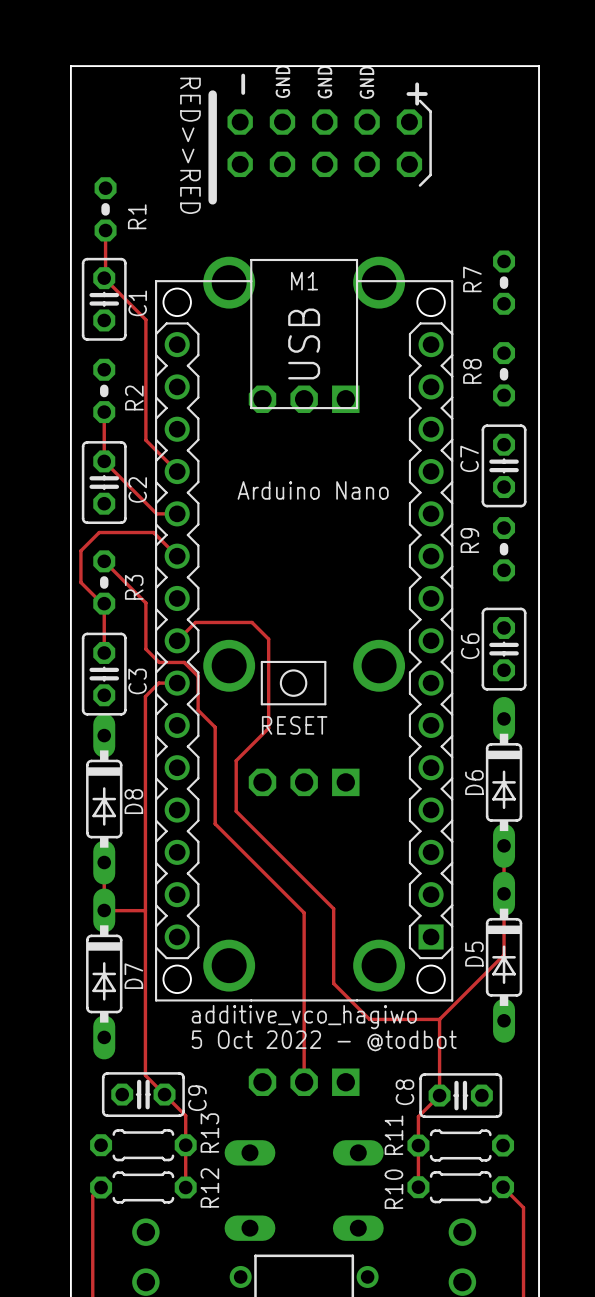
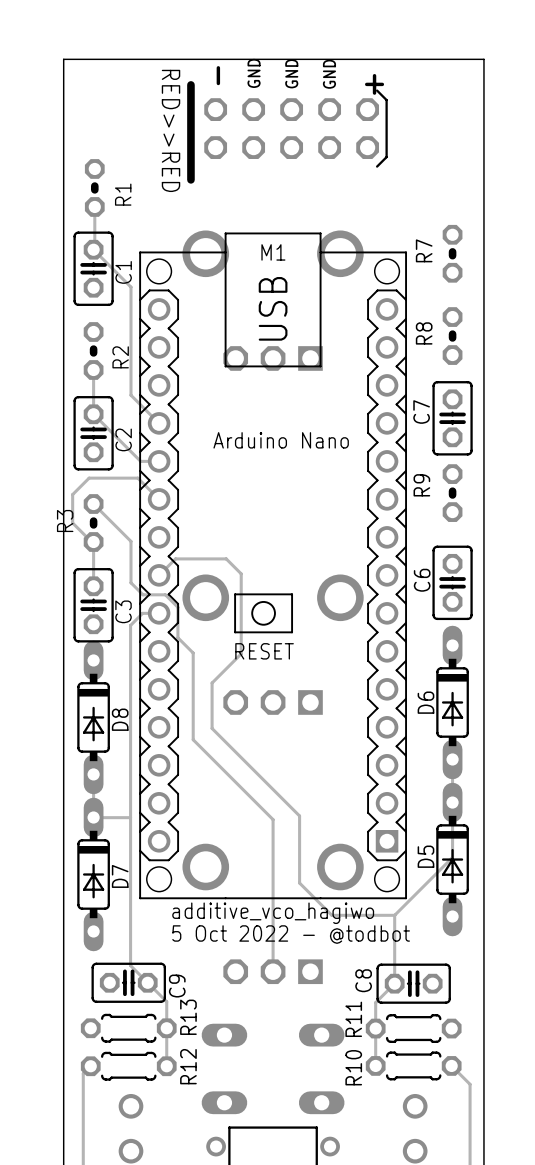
R3 name position: R3 (134, 587) -> R3 (65, 520)

